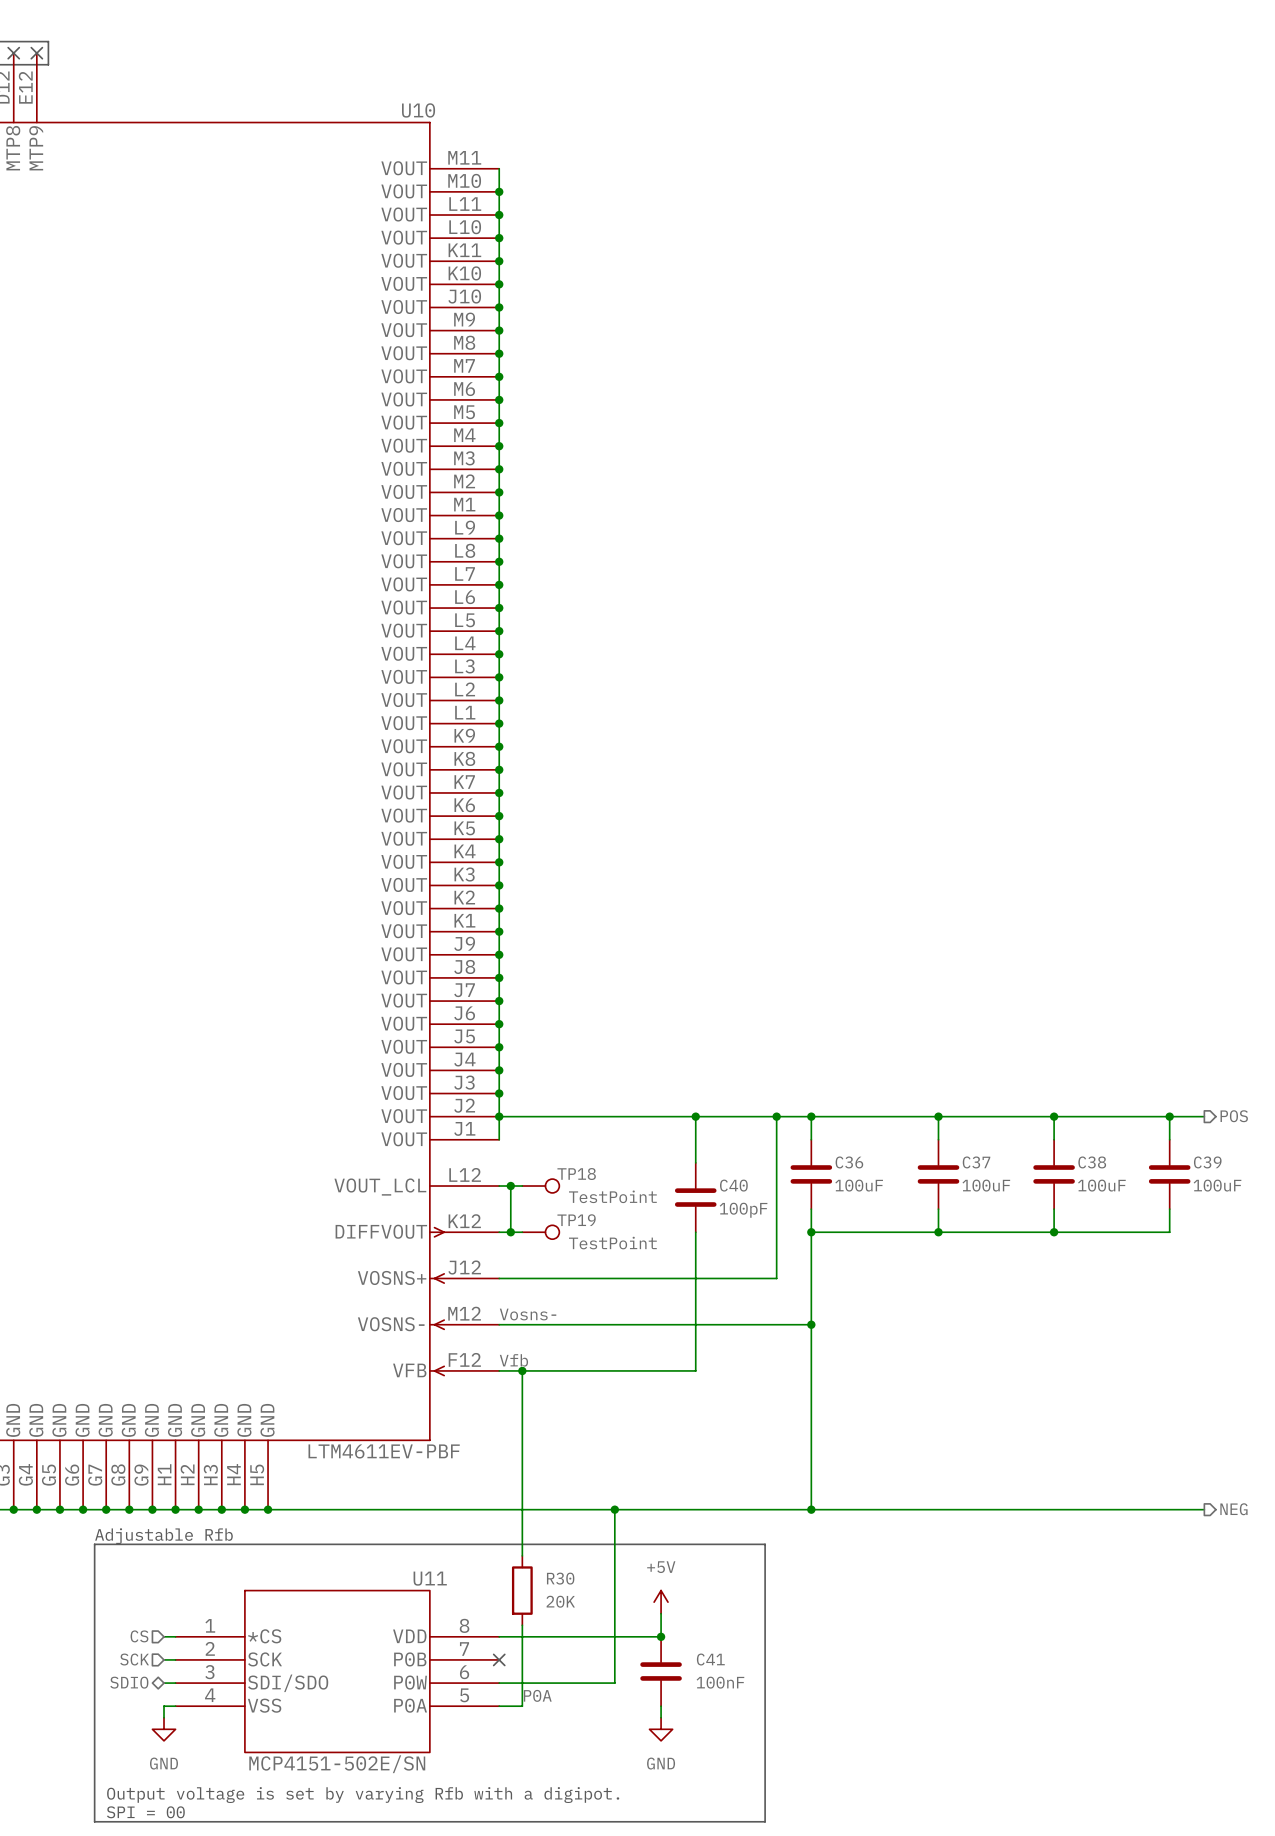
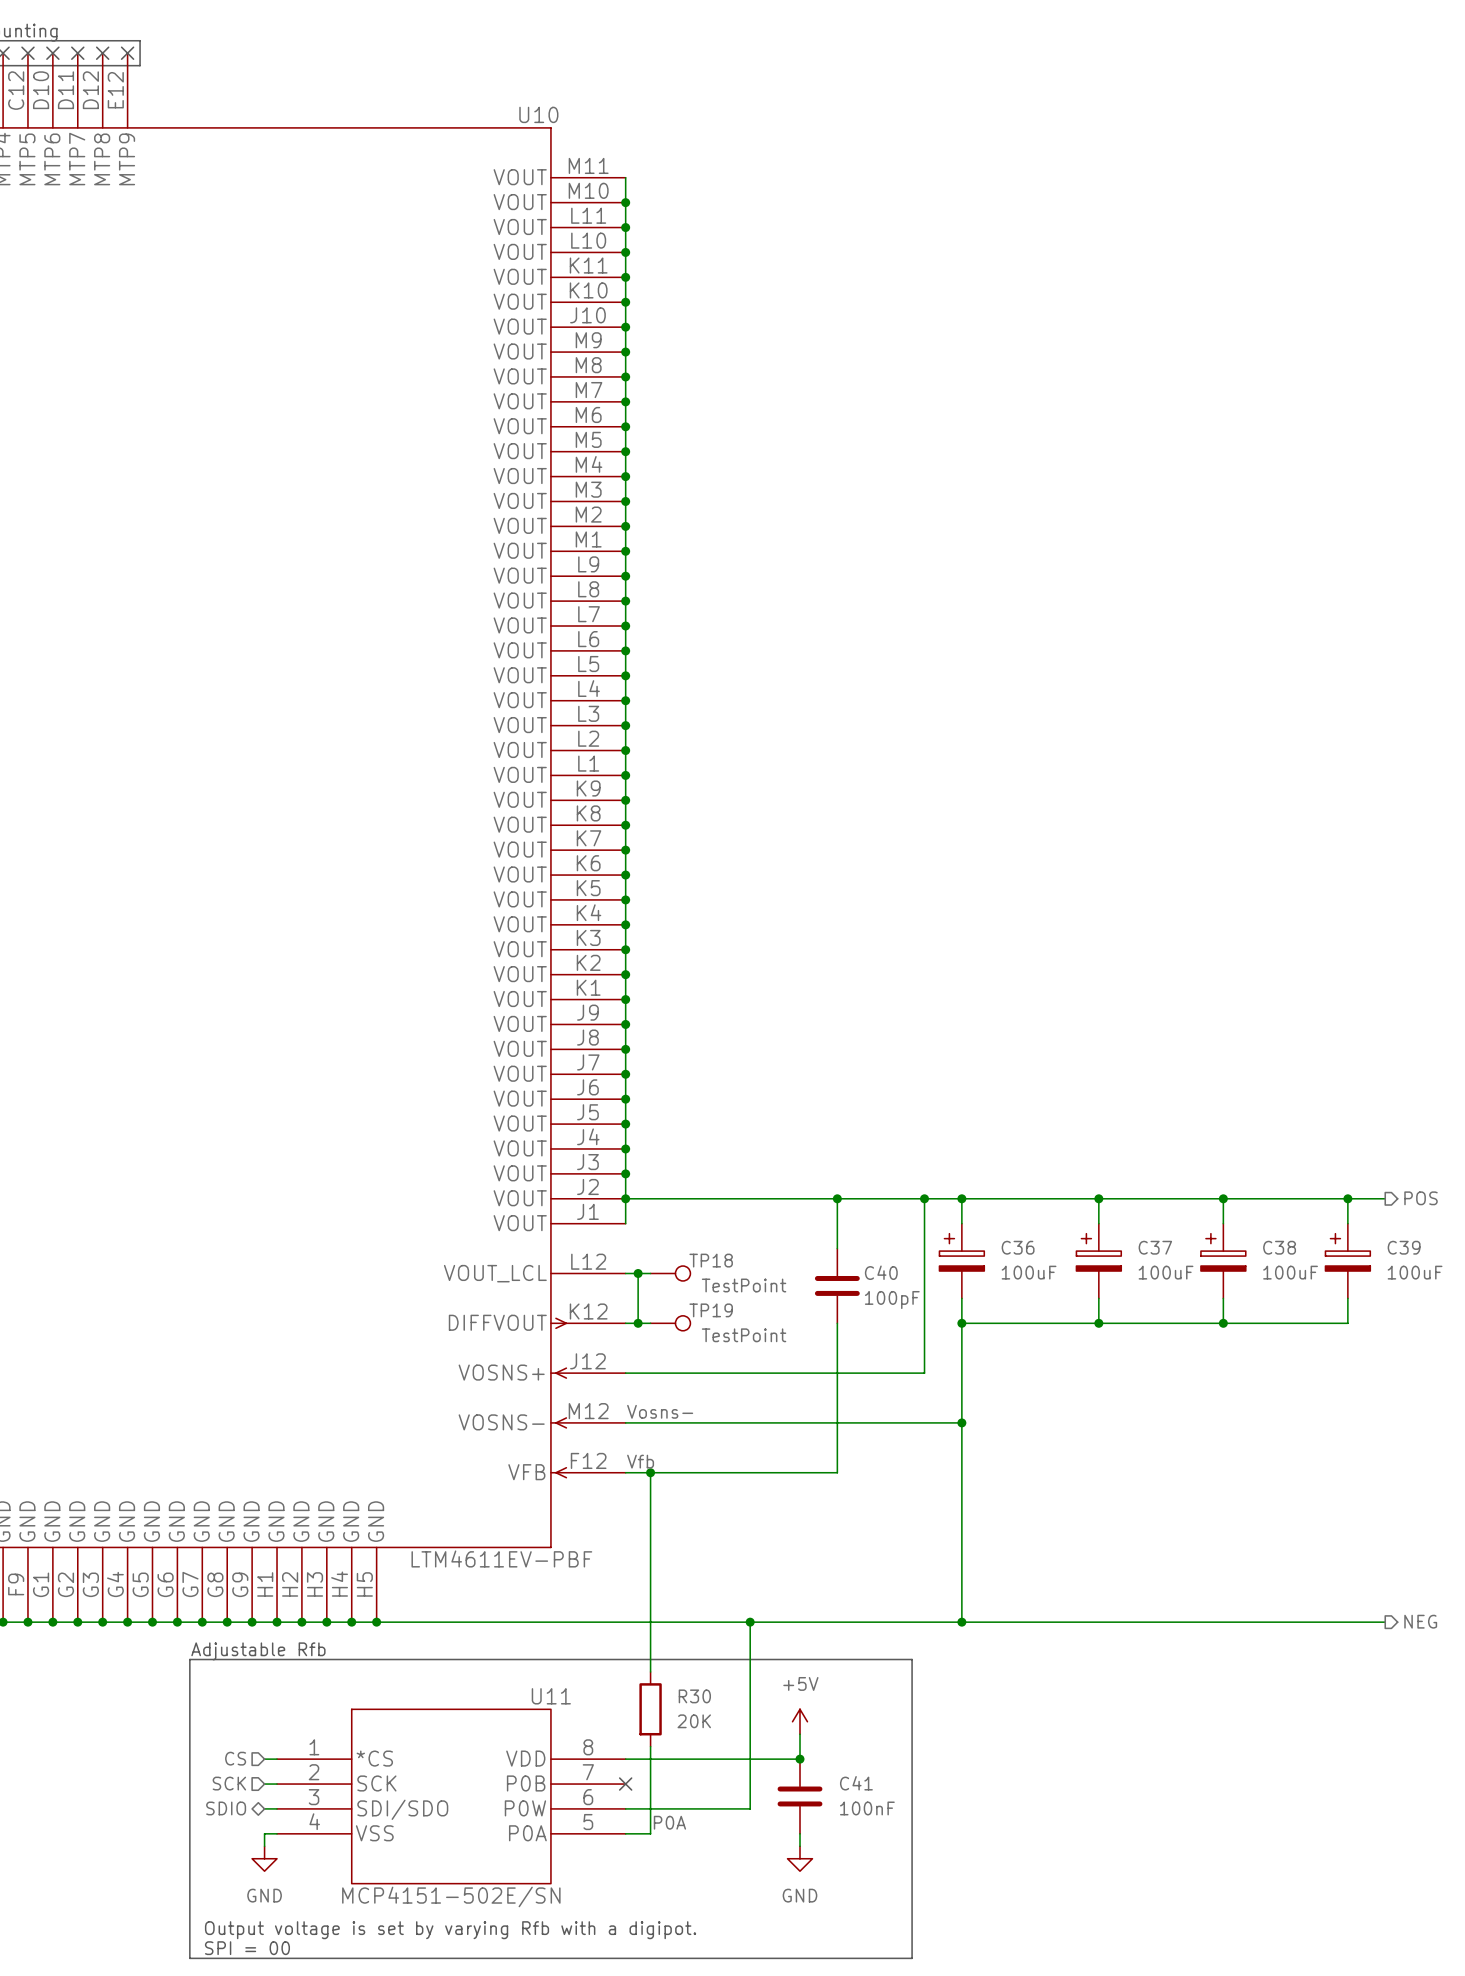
C36 symbol: [790, 1139, 833, 1210] -> [939, 1223, 985, 1299]
C37 symbol: [917, 1139, 960, 1210] -> [1076, 1223, 1122, 1299]
C38 symbol: [1033, 1139, 1075, 1210] -> [1200, 1223, 1246, 1299]
C39 symbol: [1148, 1139, 1191, 1210] -> [1325, 1223, 1371, 1299]

